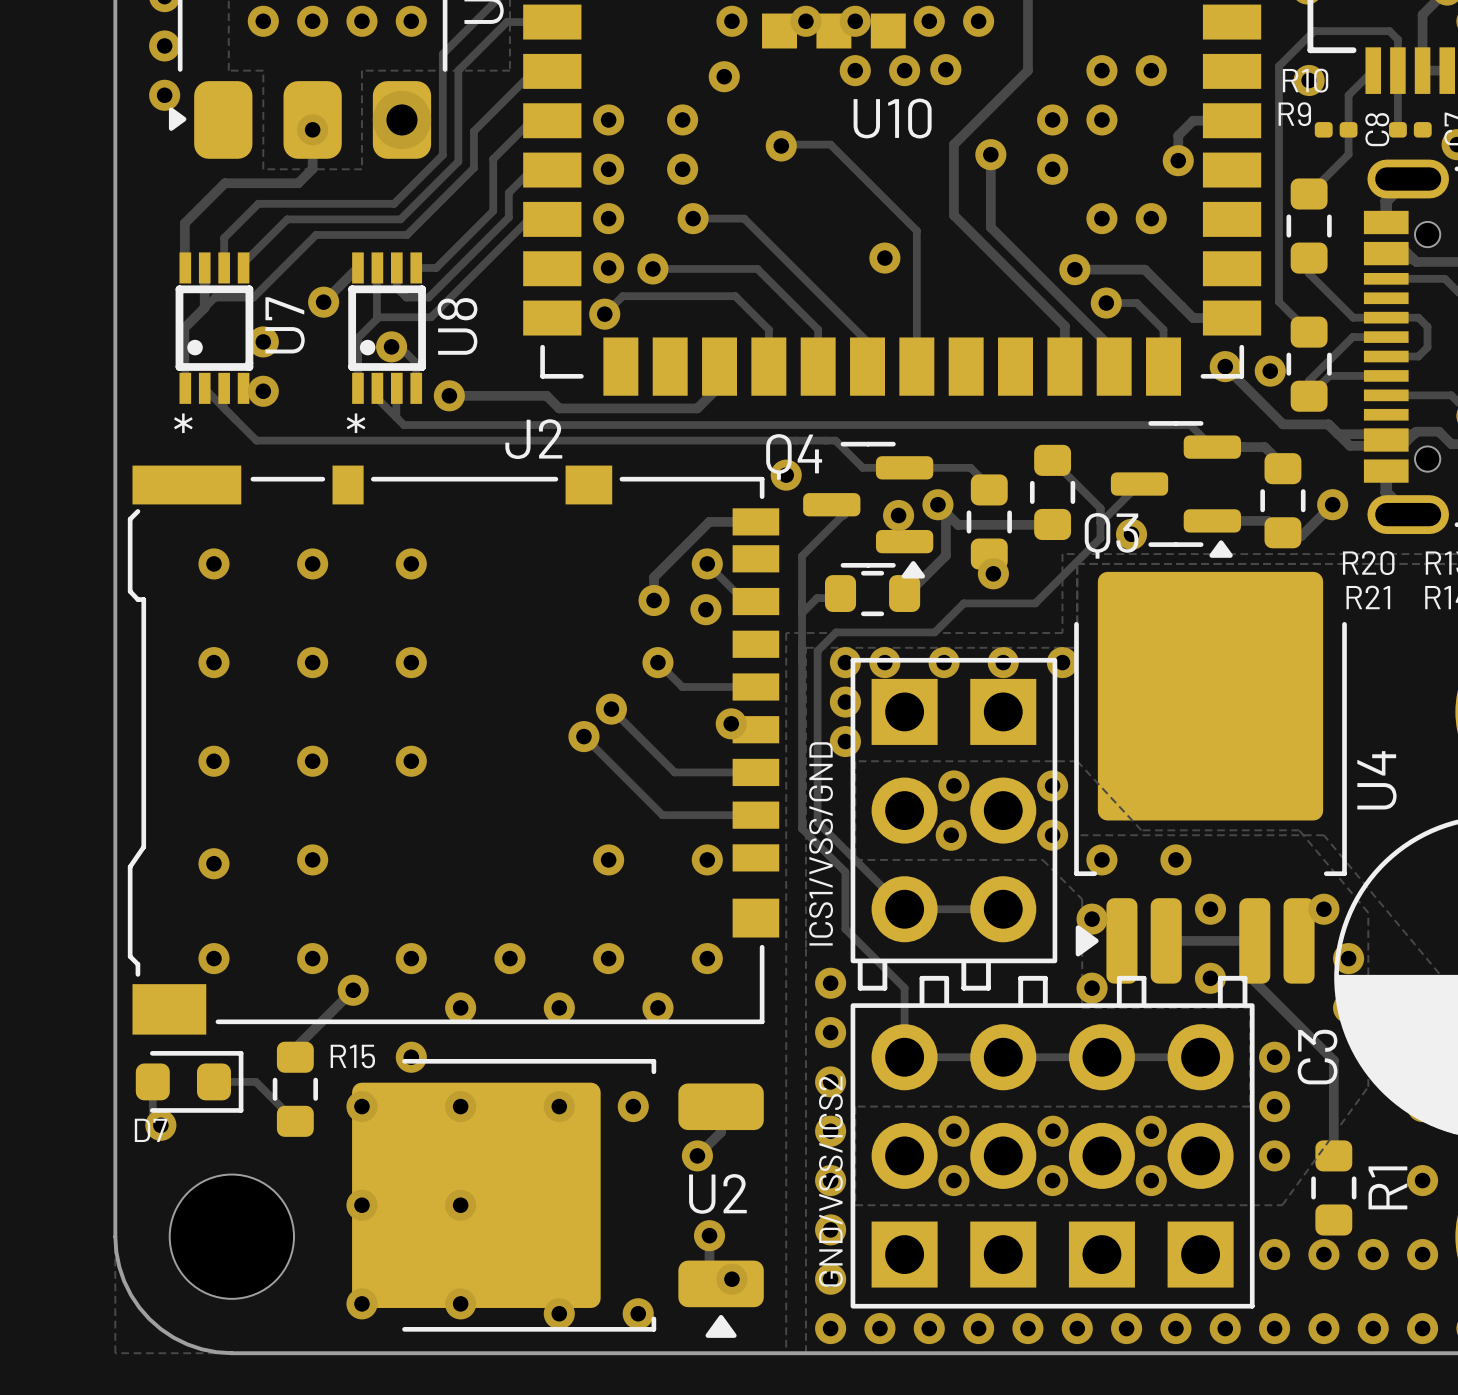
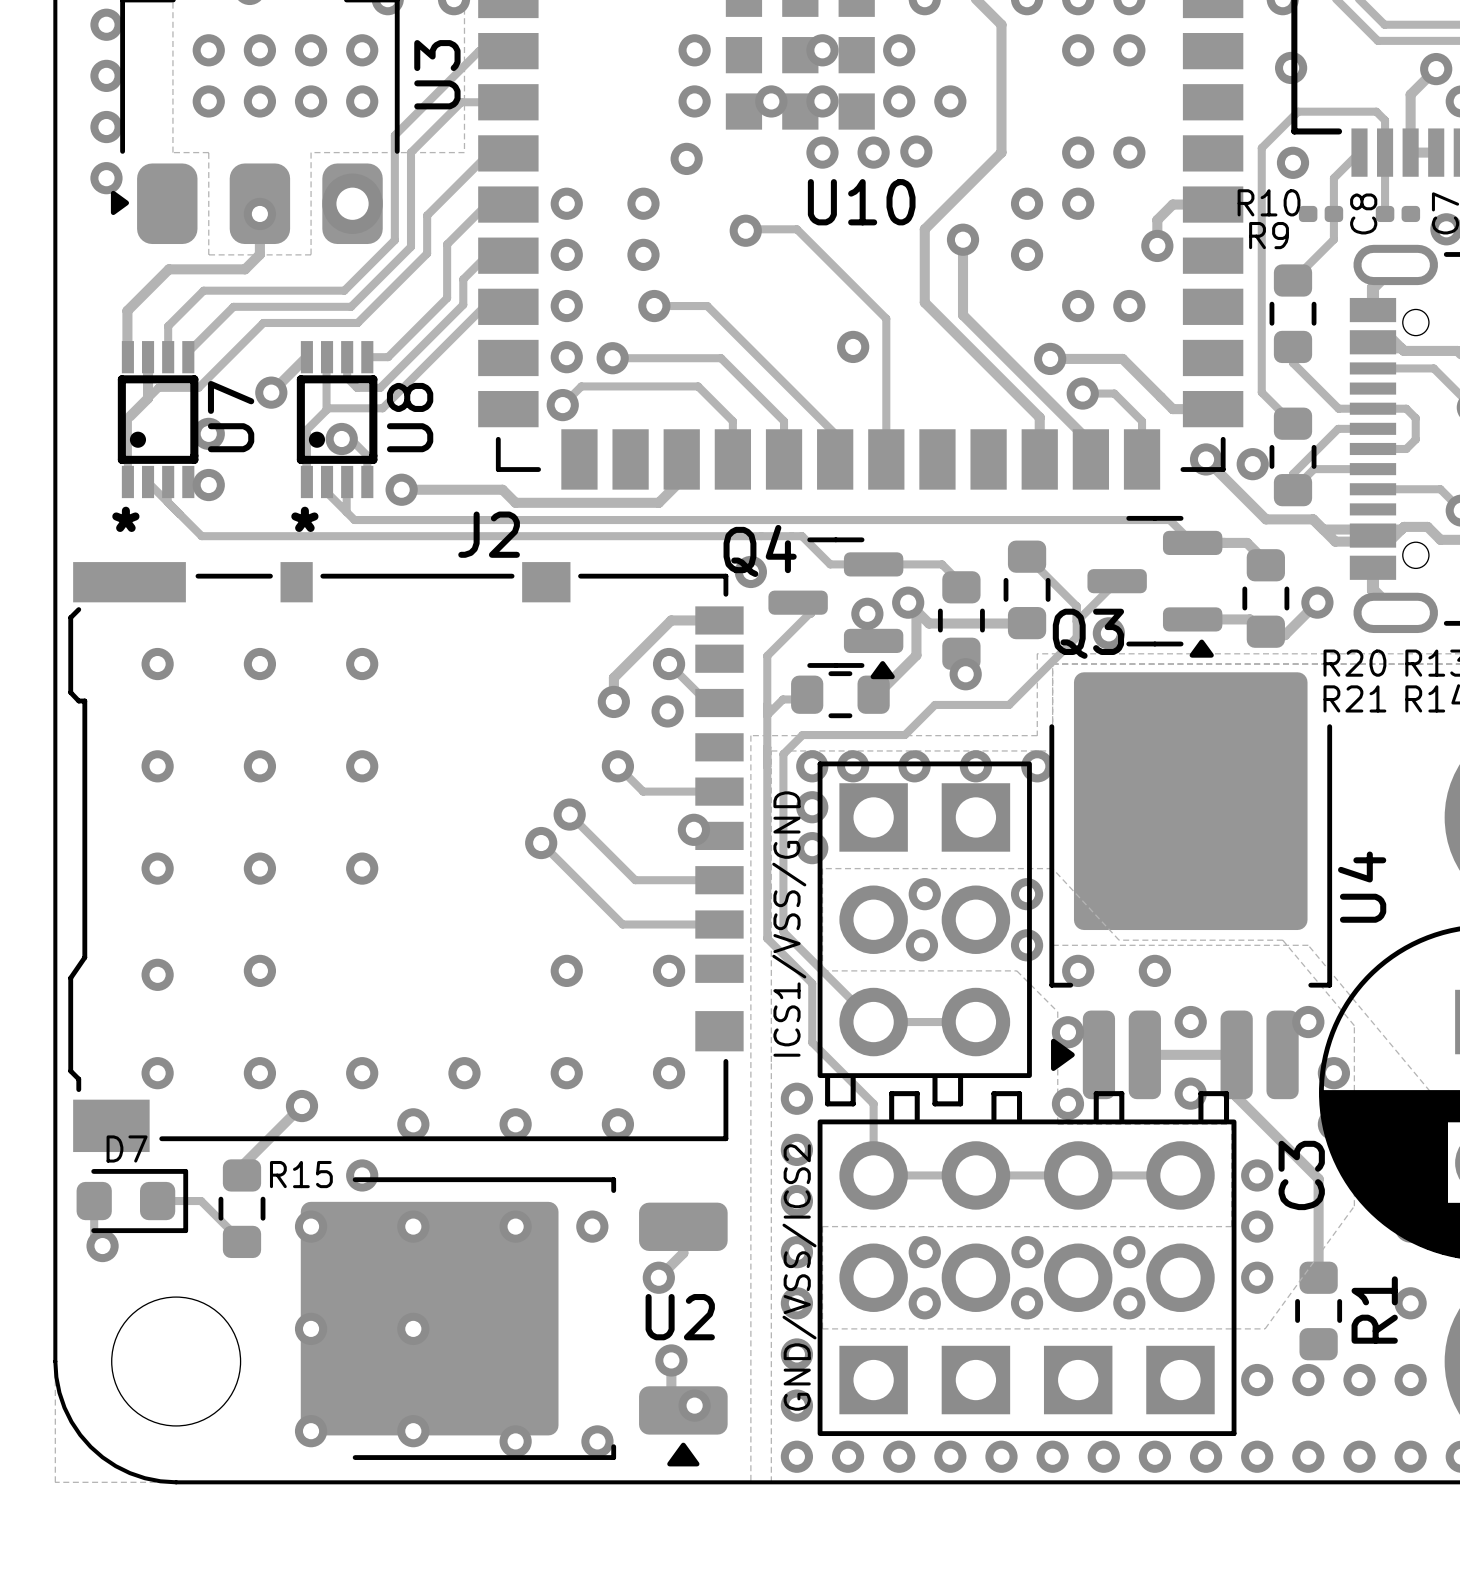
R10 name position: R10 (1305, 80) -> R10 (1269, 202)
R9 name position: R9 (1294, 114) -> R9 (1269, 235)
D7 name position: D7 (151, 1130) -> D7 (127, 1148)

